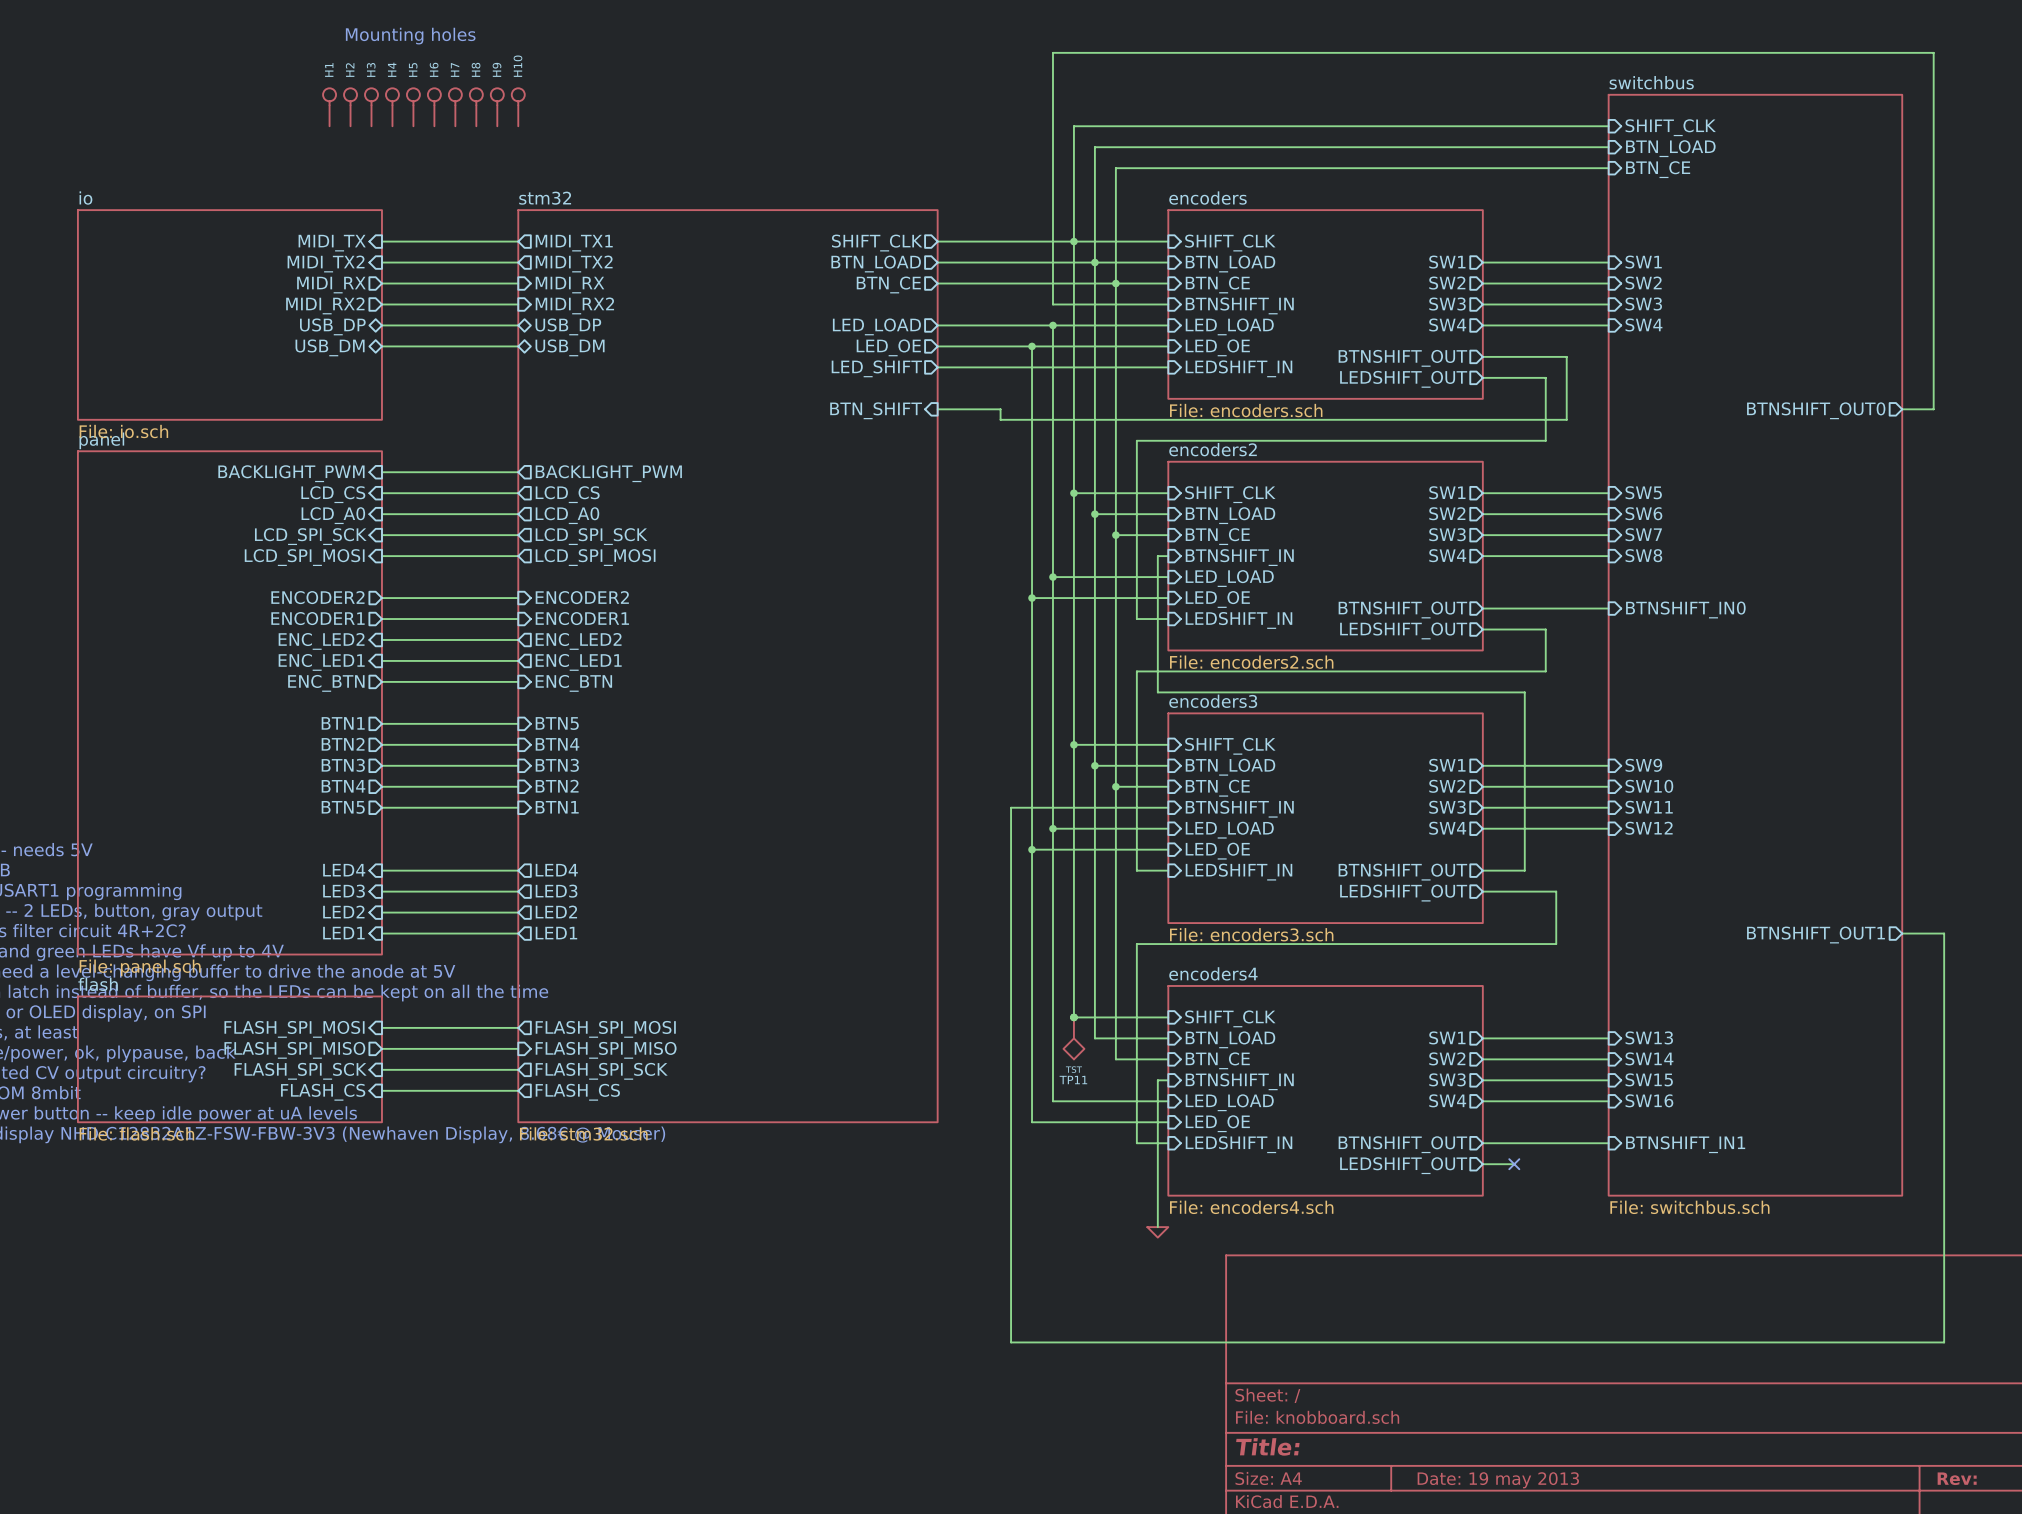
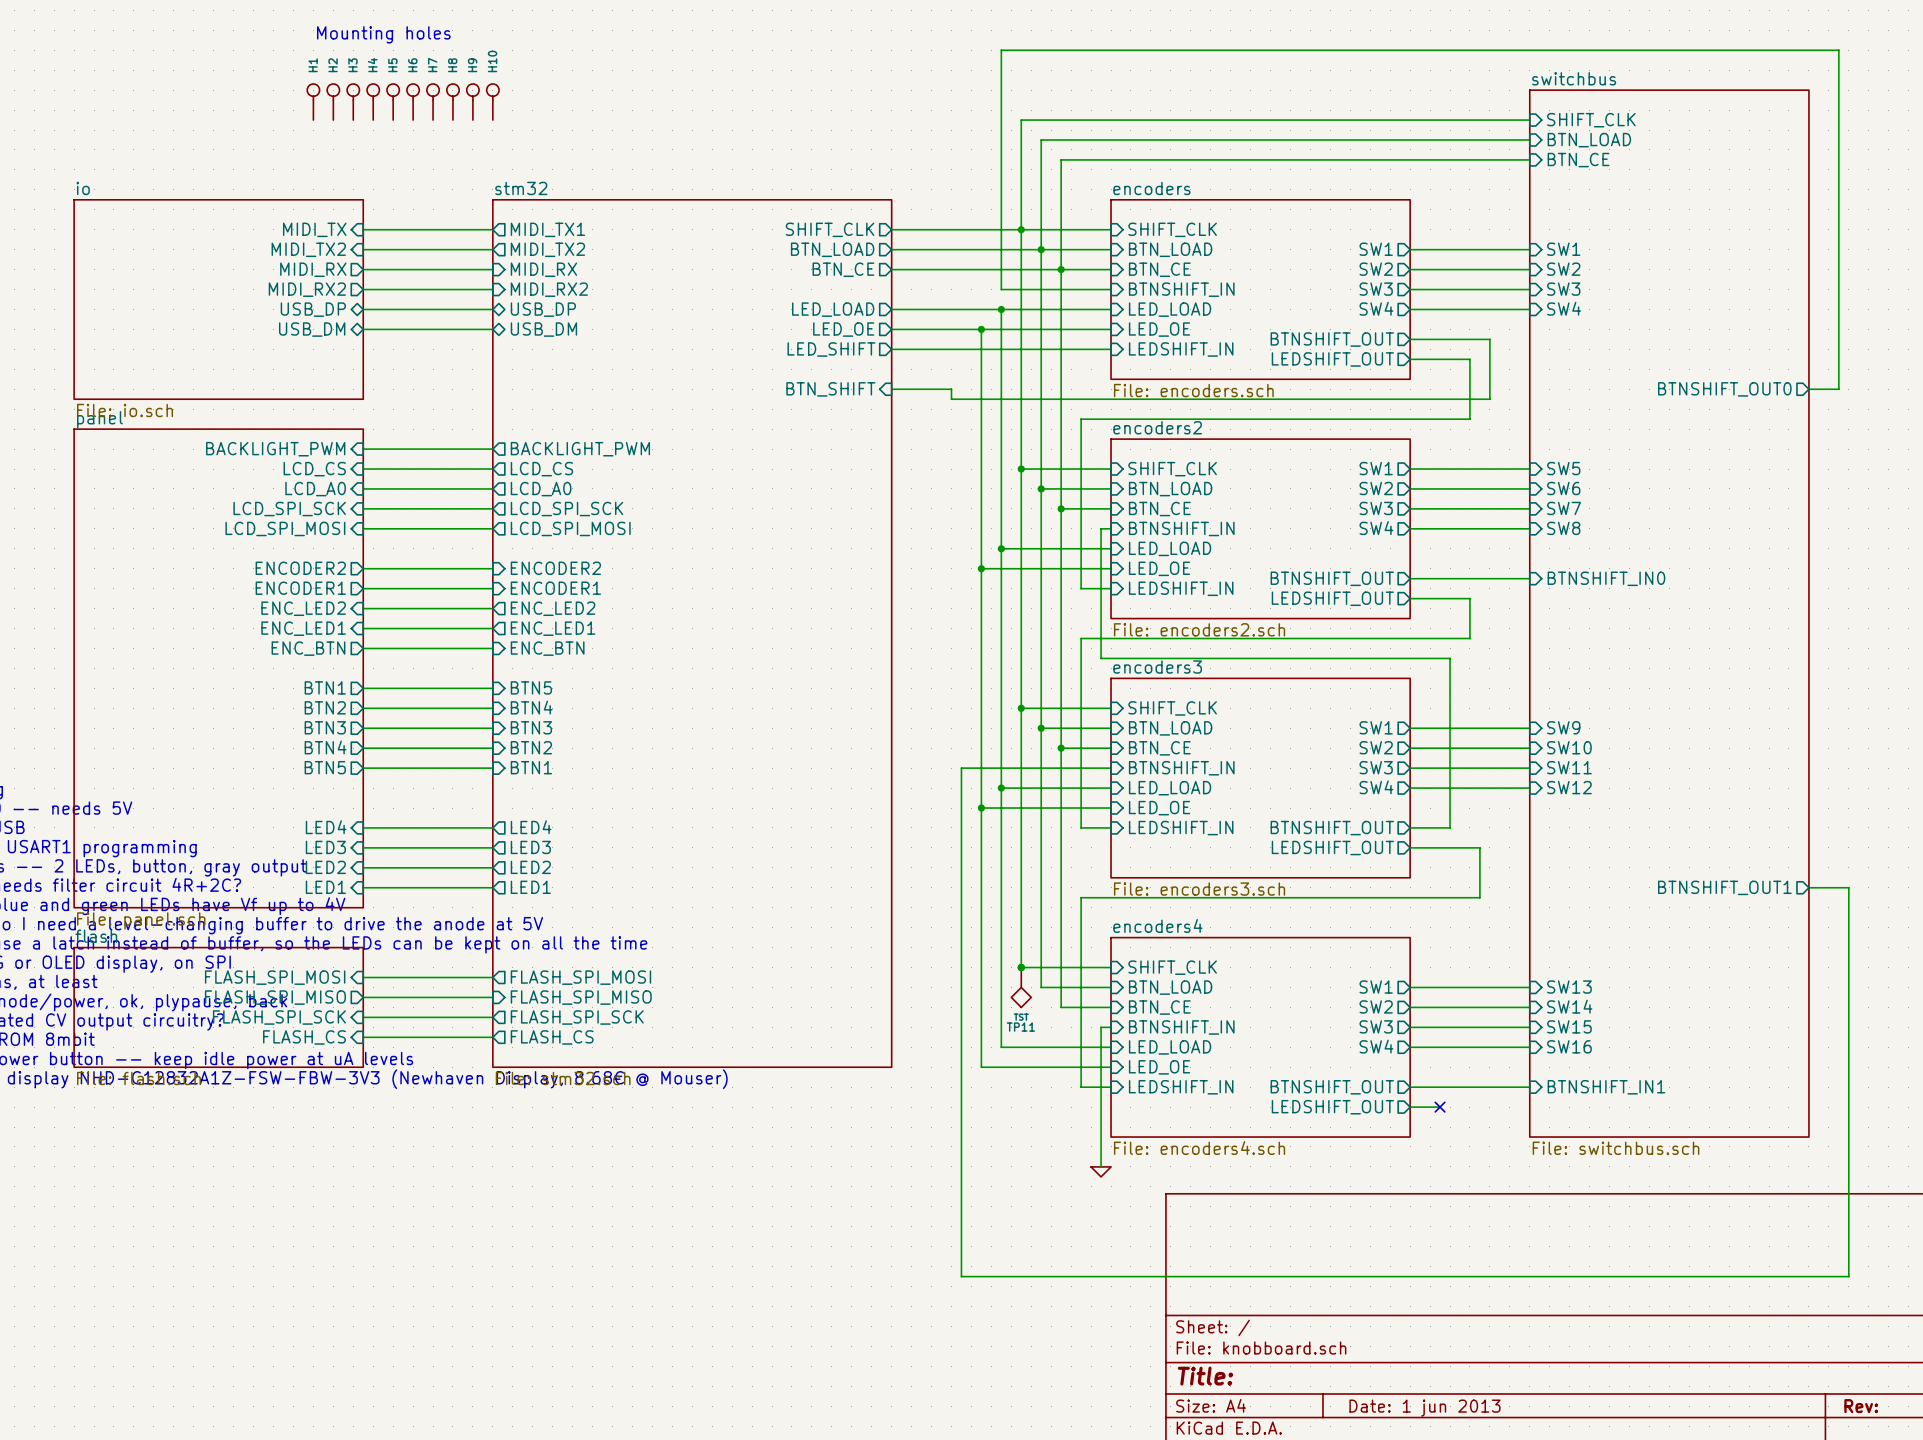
title block: Date: 19 may 2013 (1498, 1480) -> Date: 1 jun 2013 (1424, 1408)

